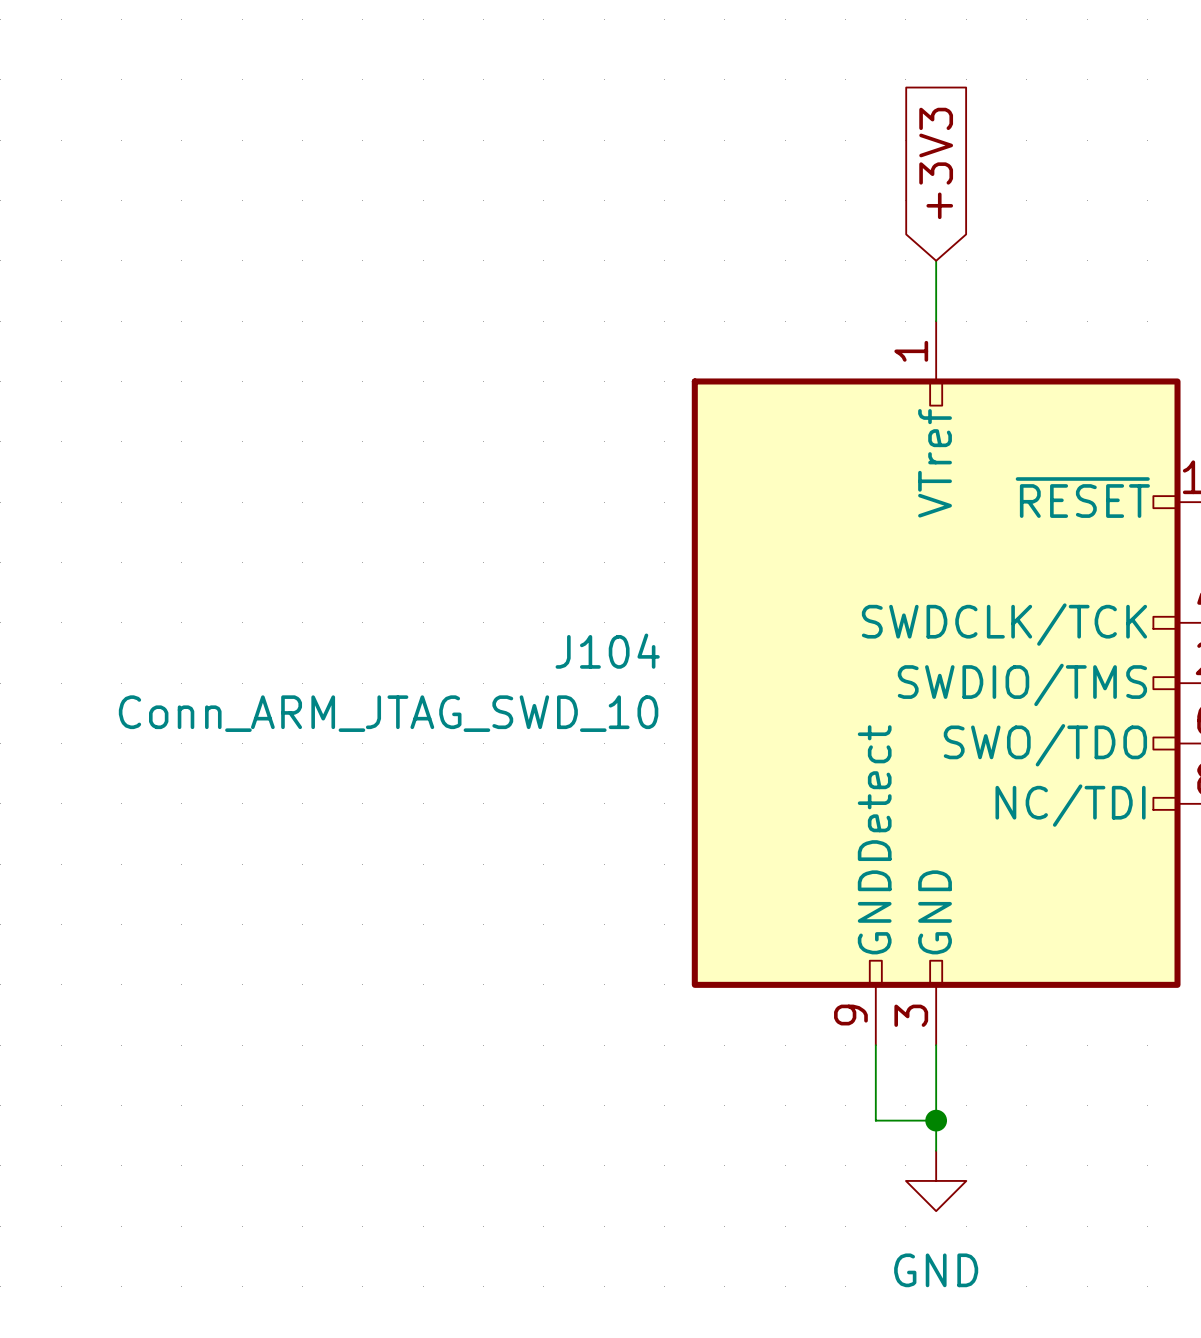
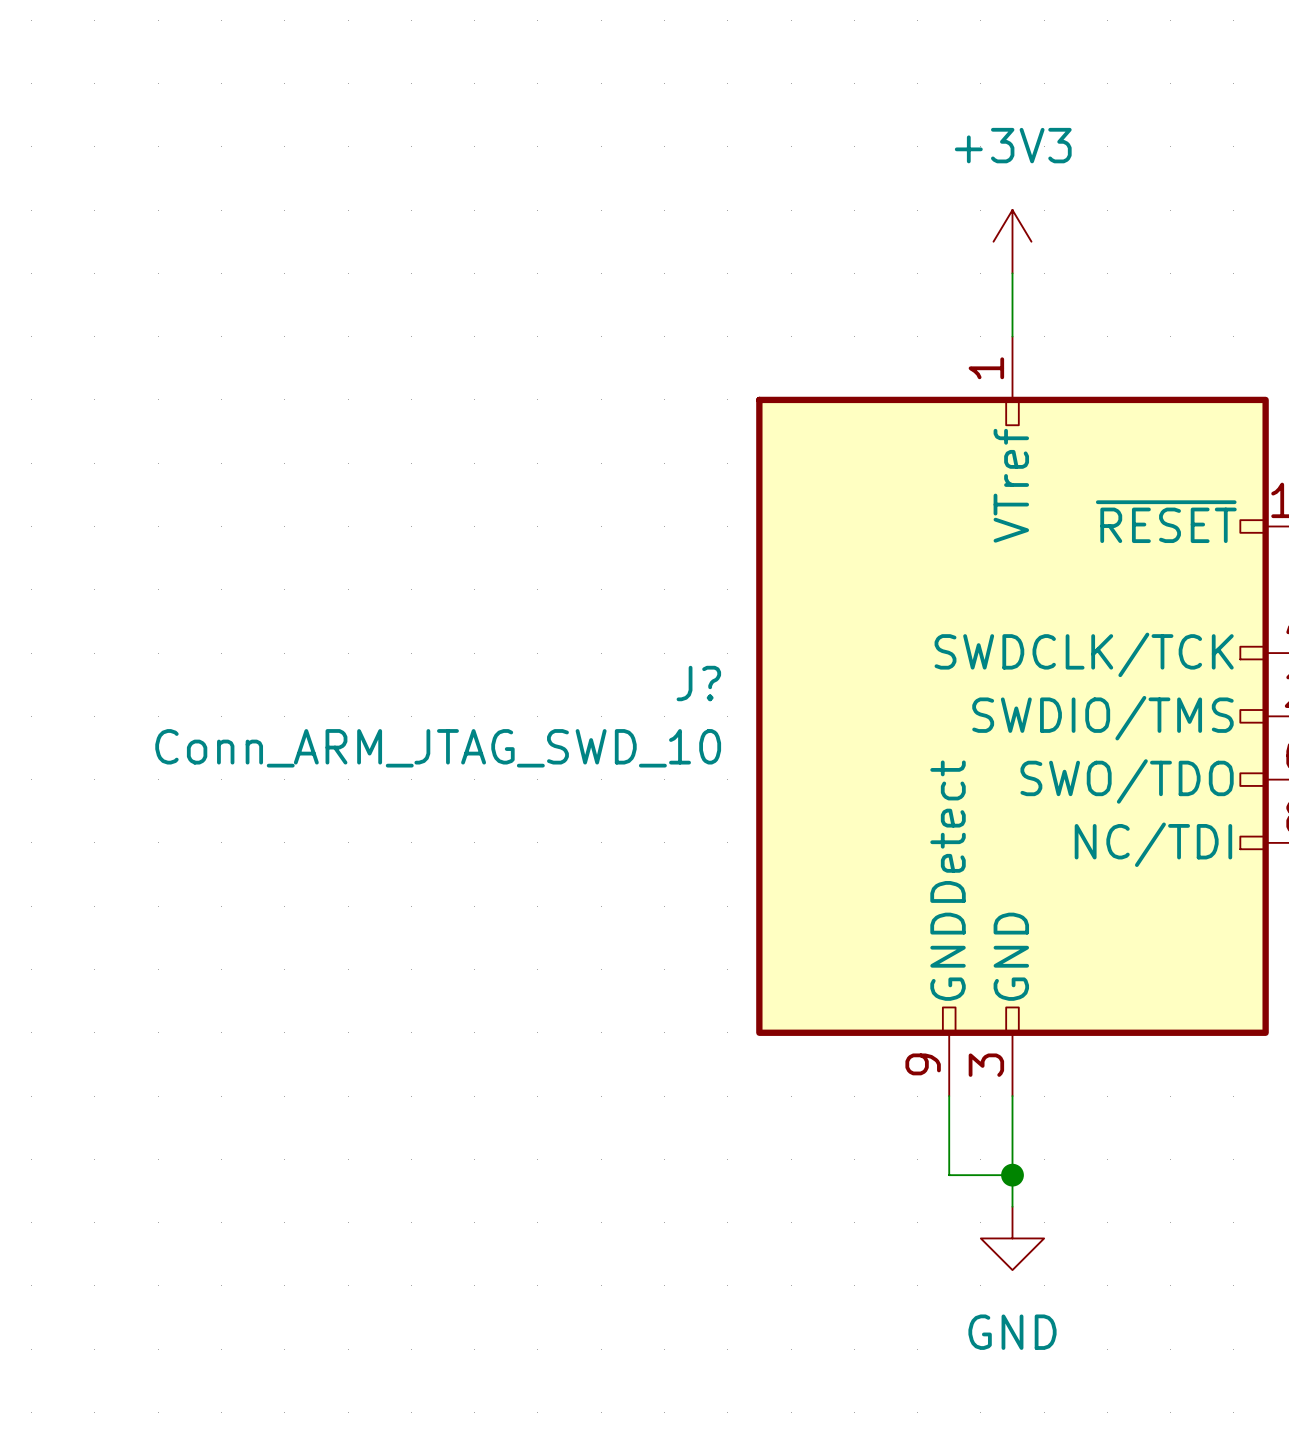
global label: +3V3 (936, 163) -> none
power symbol: none -> +3V3 (1012, 241)
J104 name: J104 (607, 651) -> J? (698, 683)

